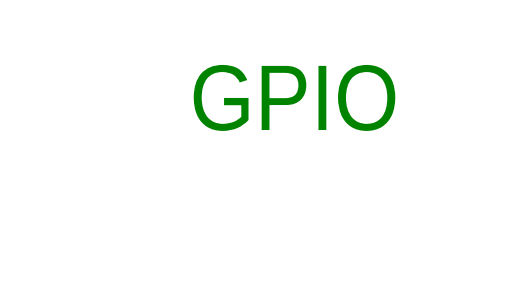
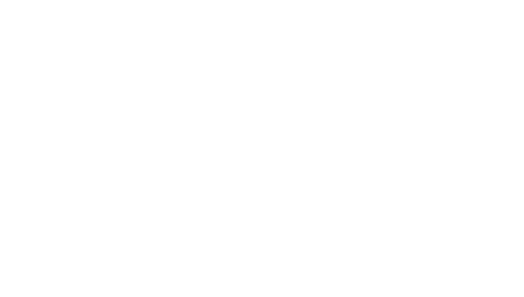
text: GPIO (294, 97) -> none

